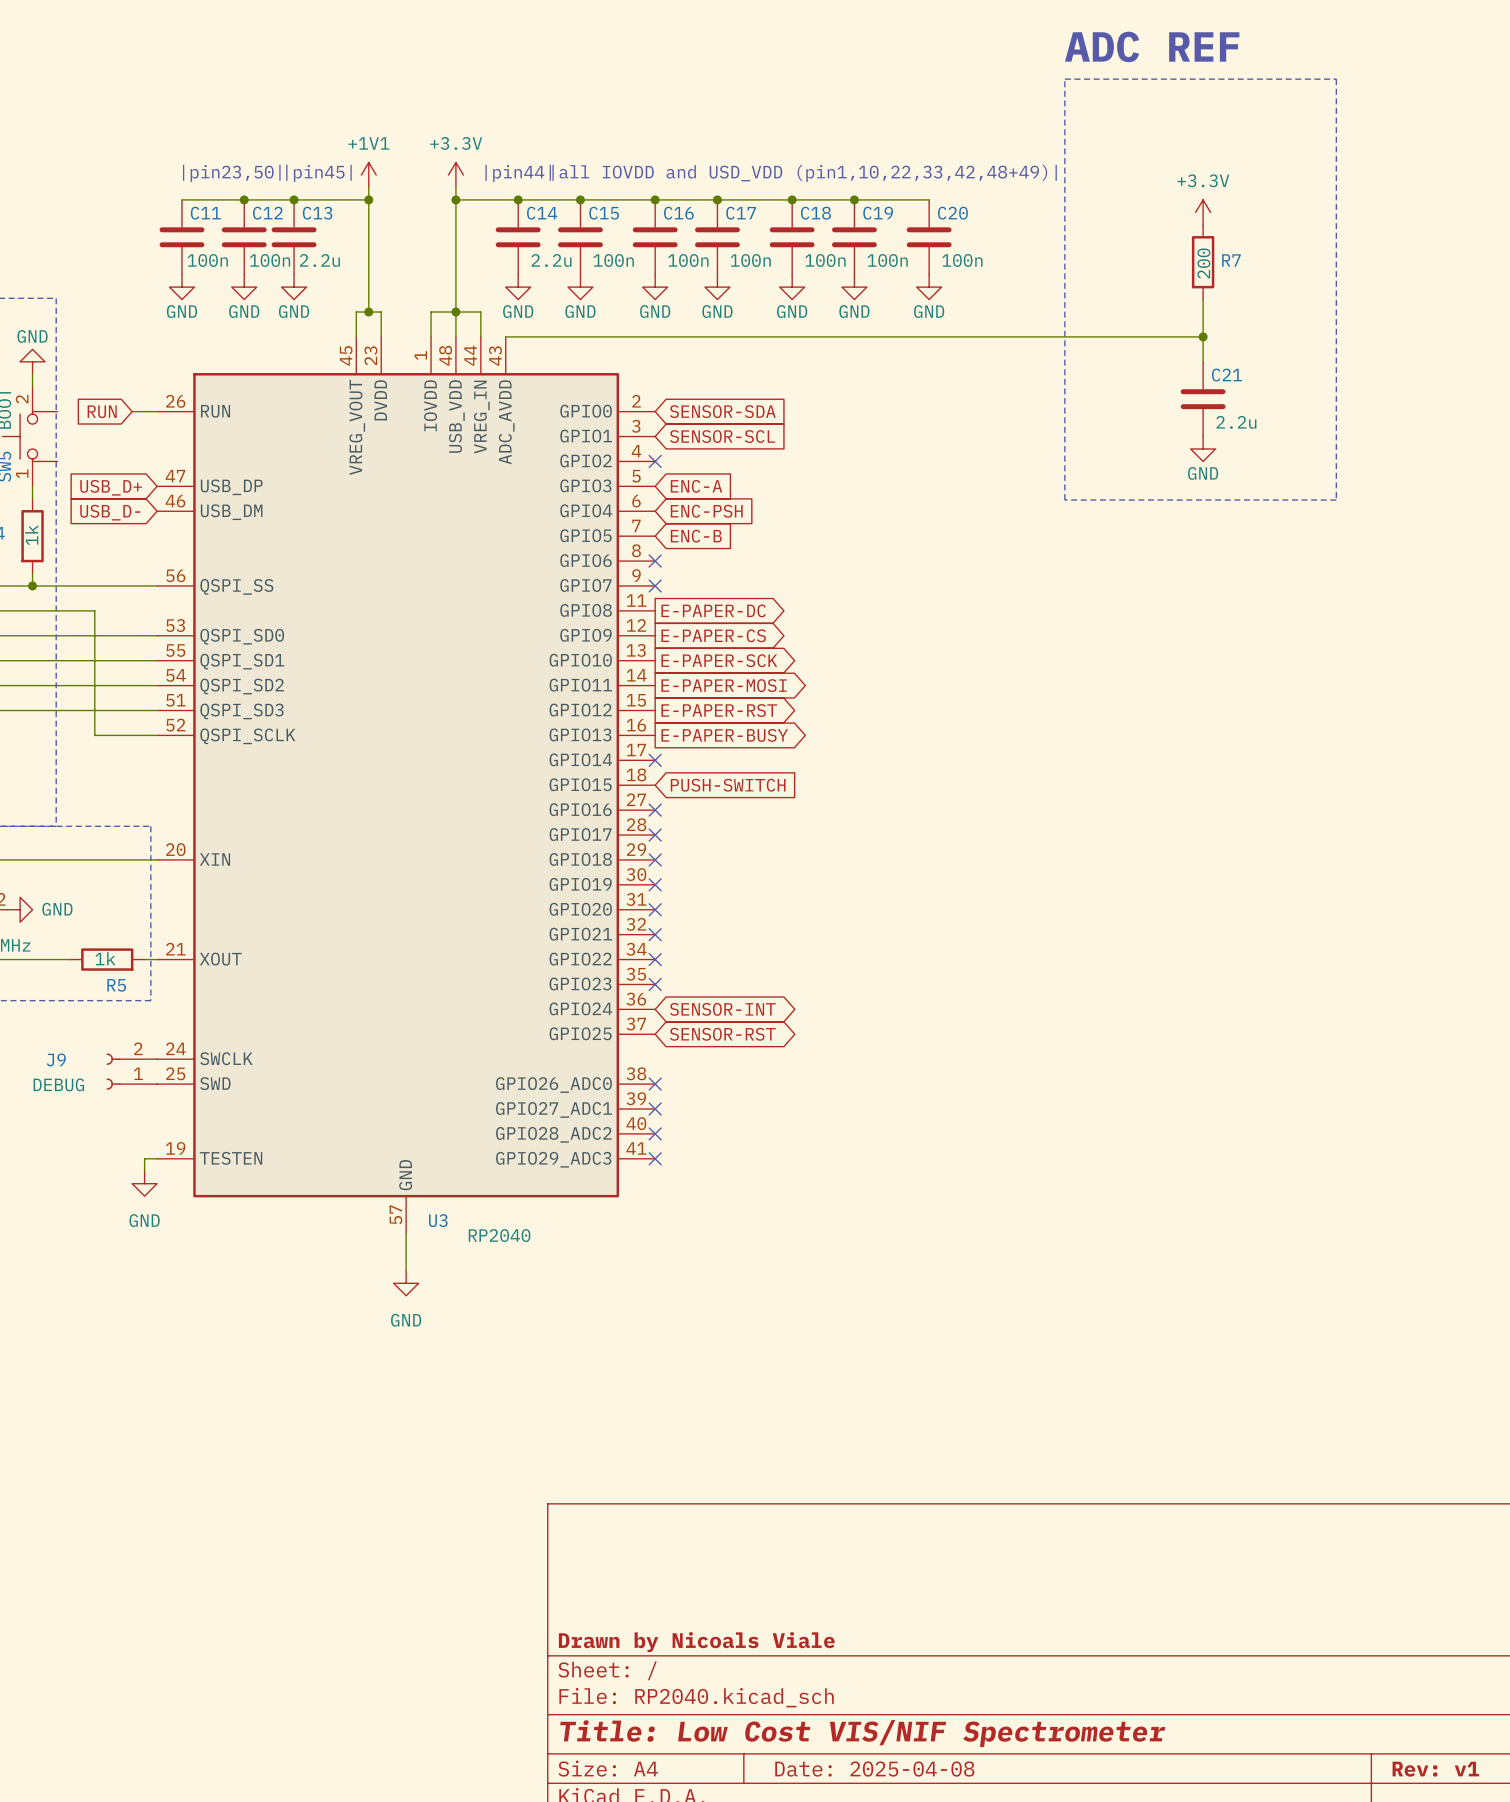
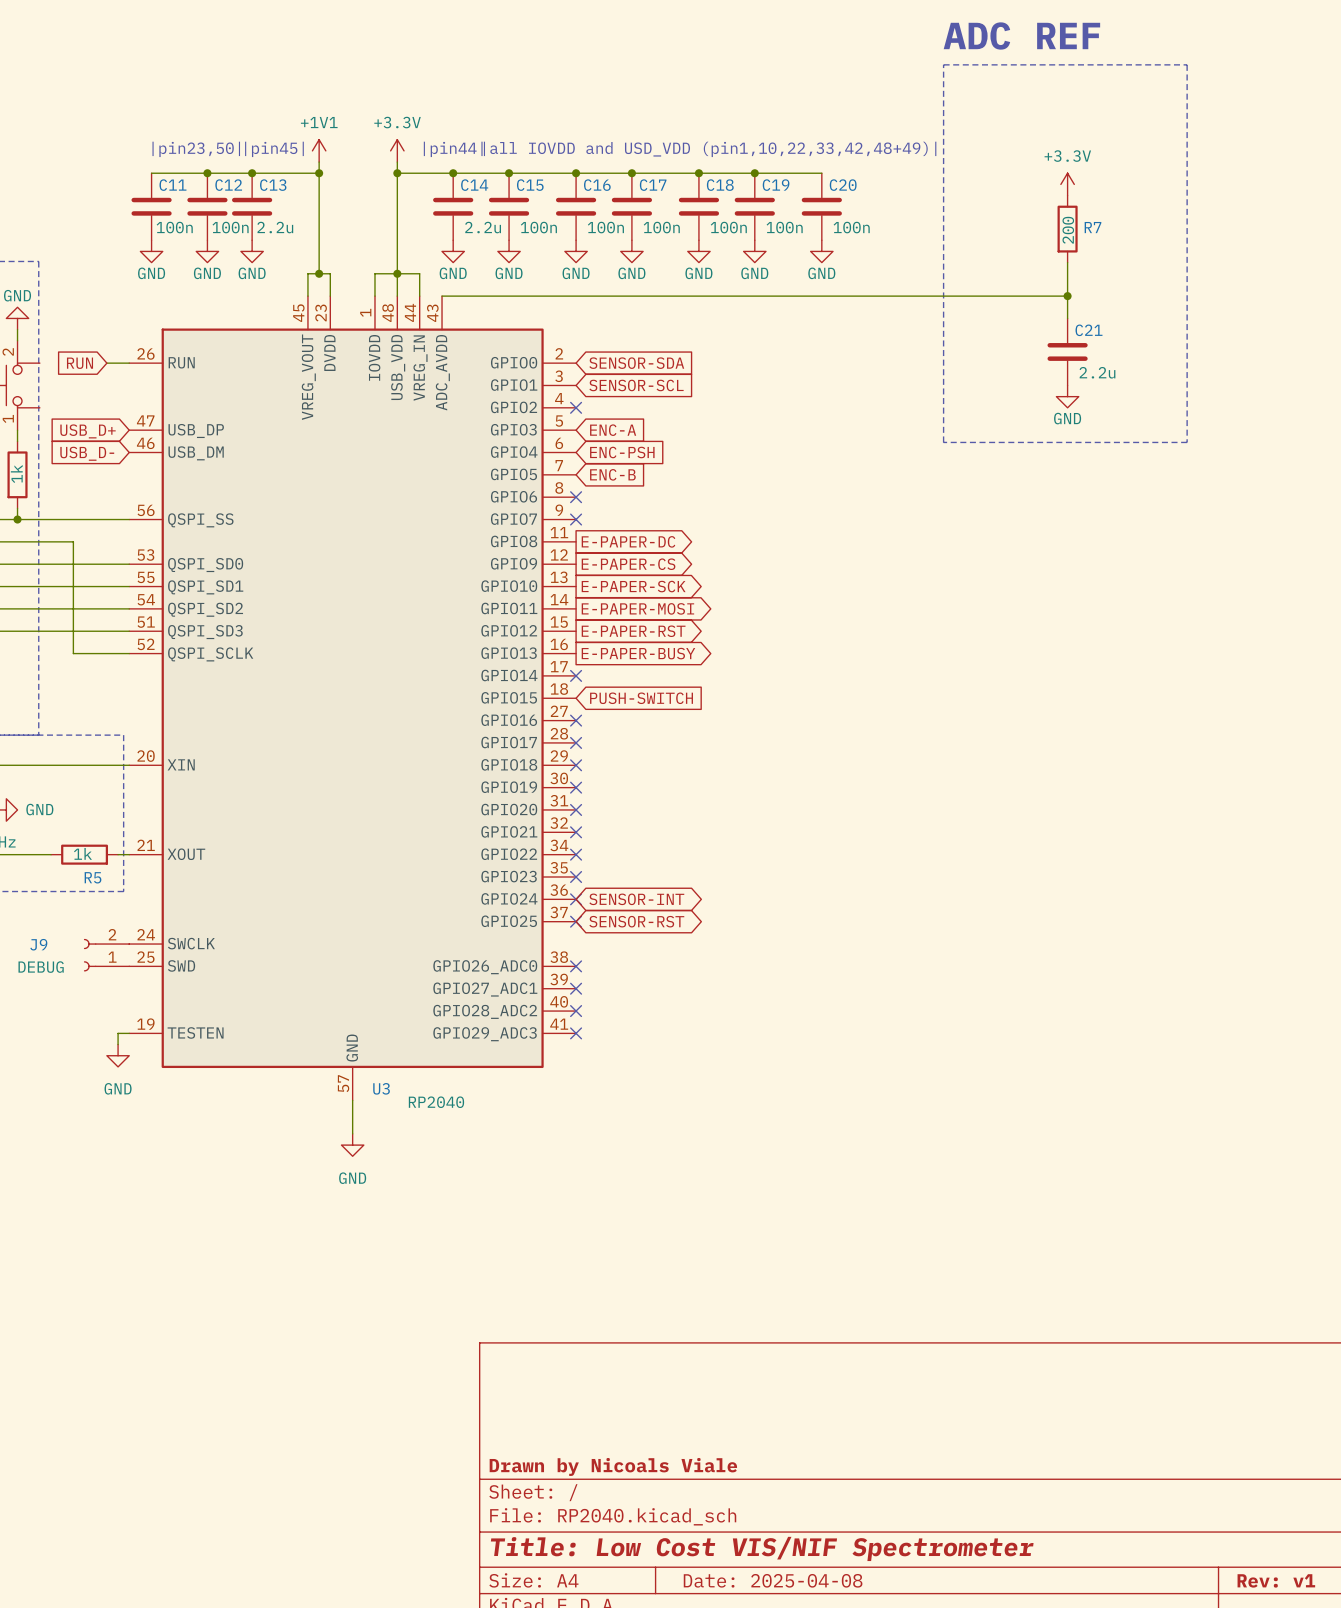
no-connect mark: none -> (576, 899)
no-connect mark: none -> (576, 921)

